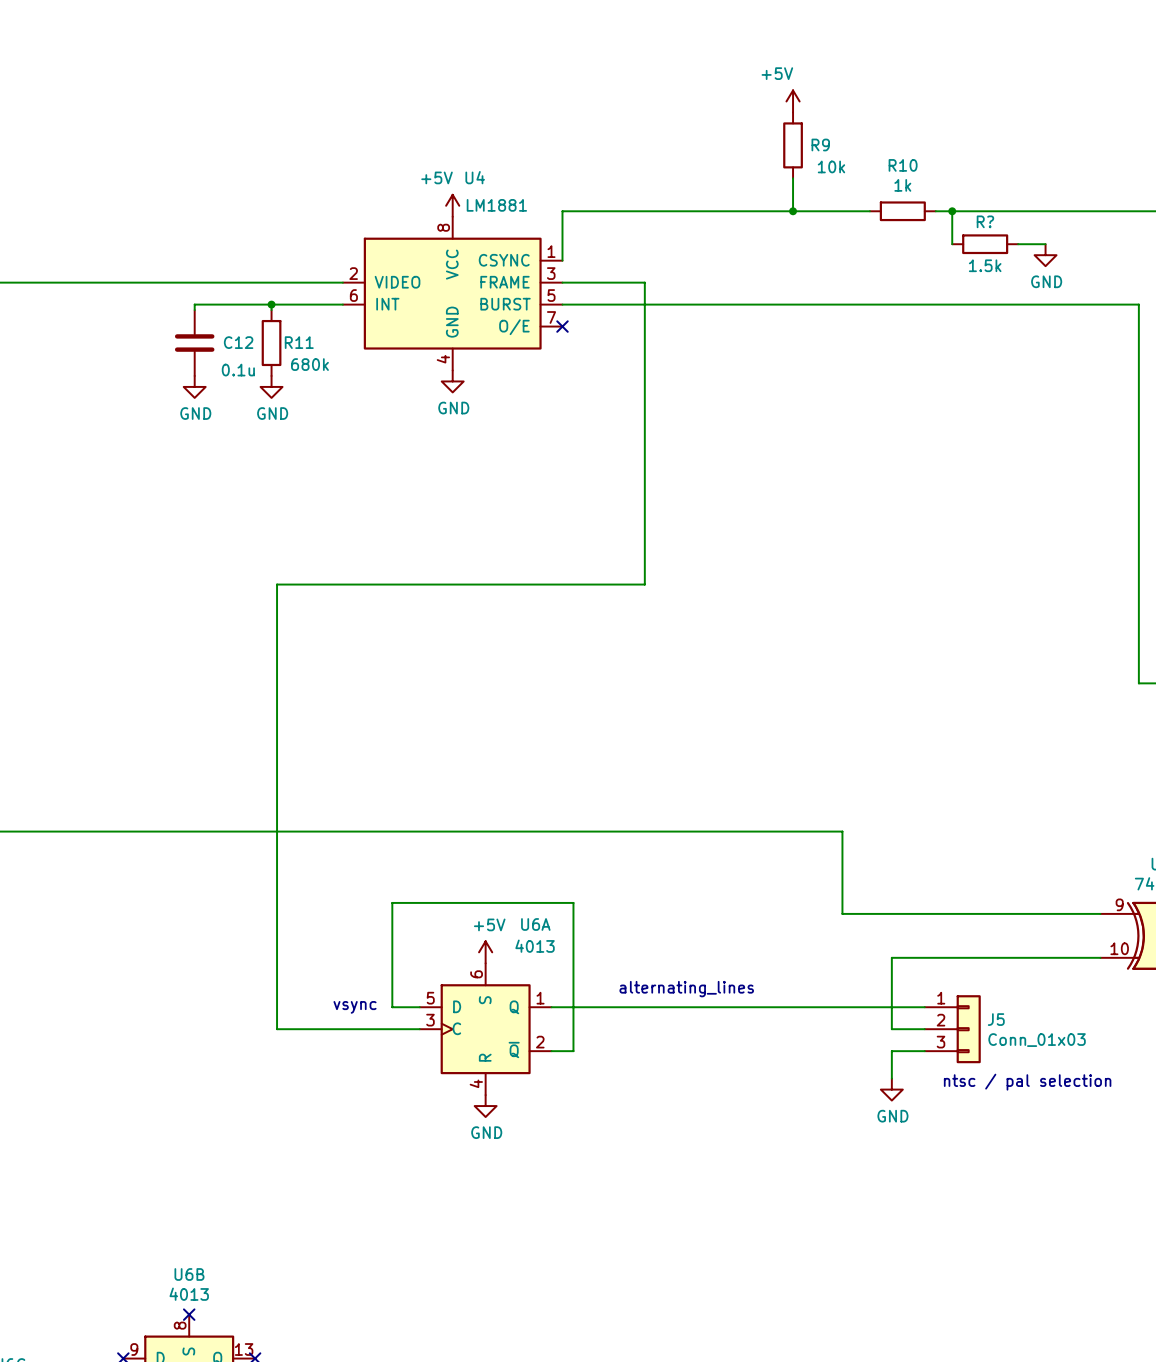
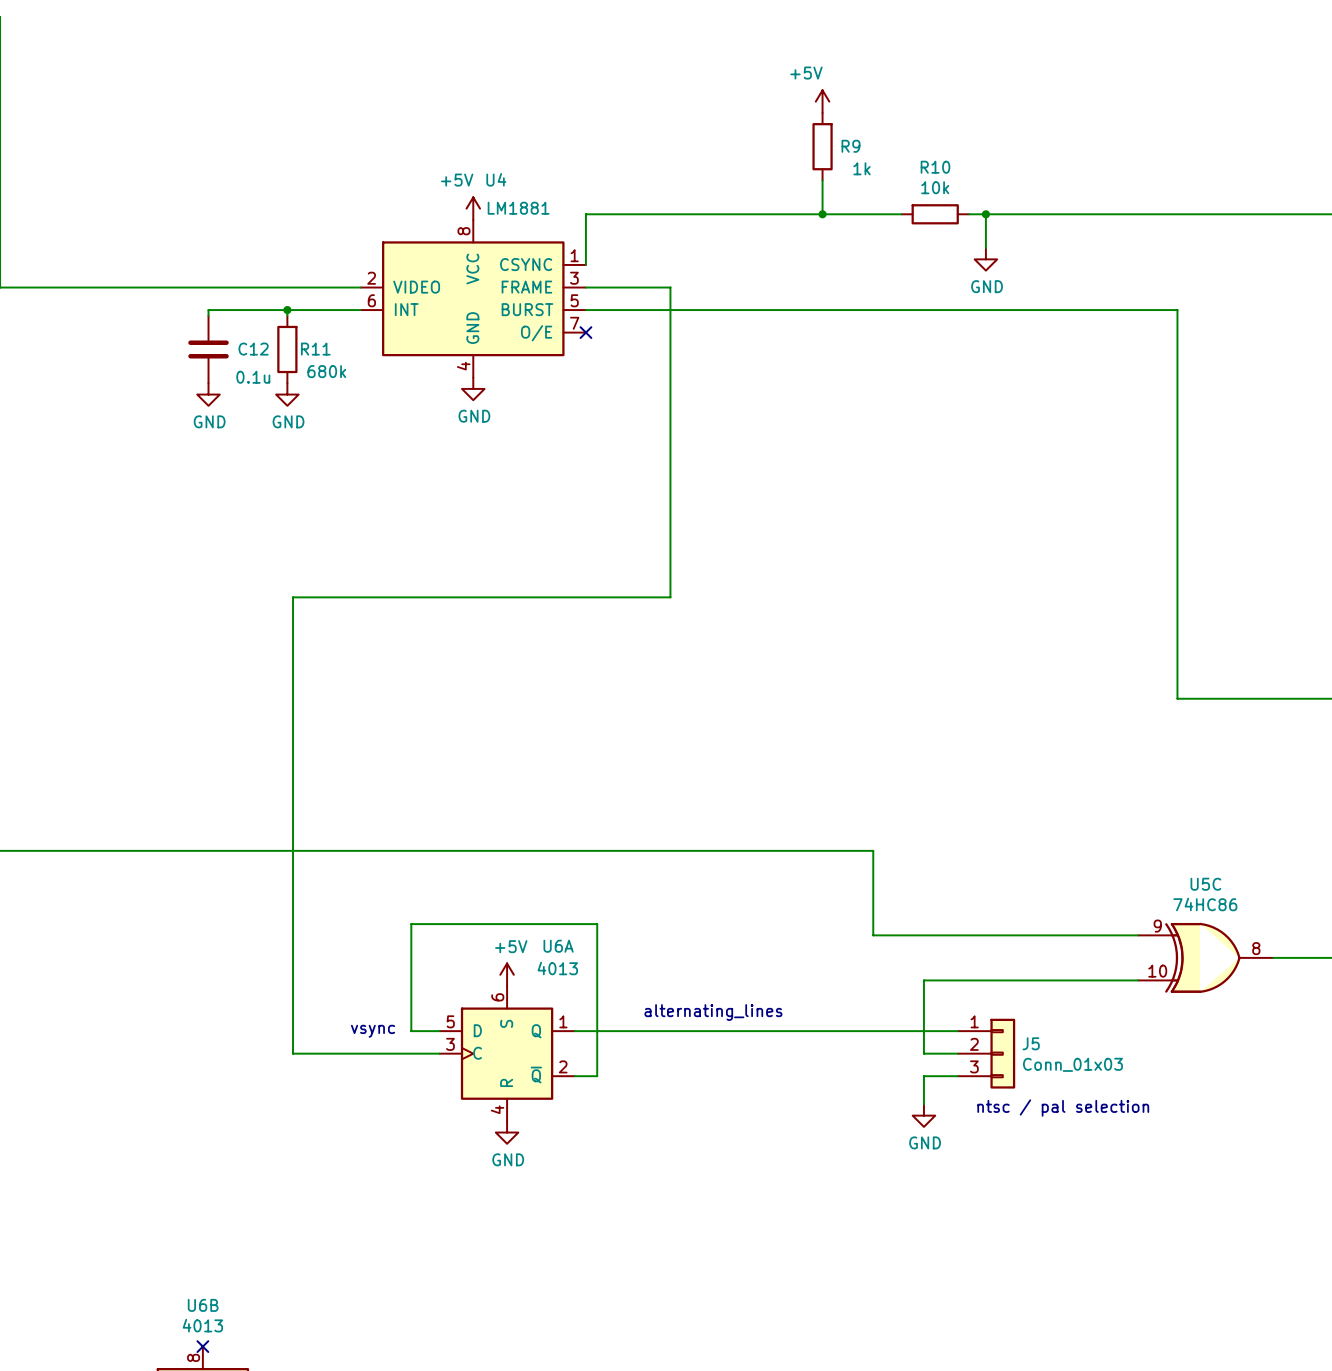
R9 value: 10k (831, 166) -> 1k (861, 168)
R10 value: 1k (902, 185) -> 10k (935, 187)
R?: 1.5k (985, 244) -> none
wire: (1018, 244) (1045, 244) -> none
power symbol position: GND (1045, 255) -> GND (985, 259)

